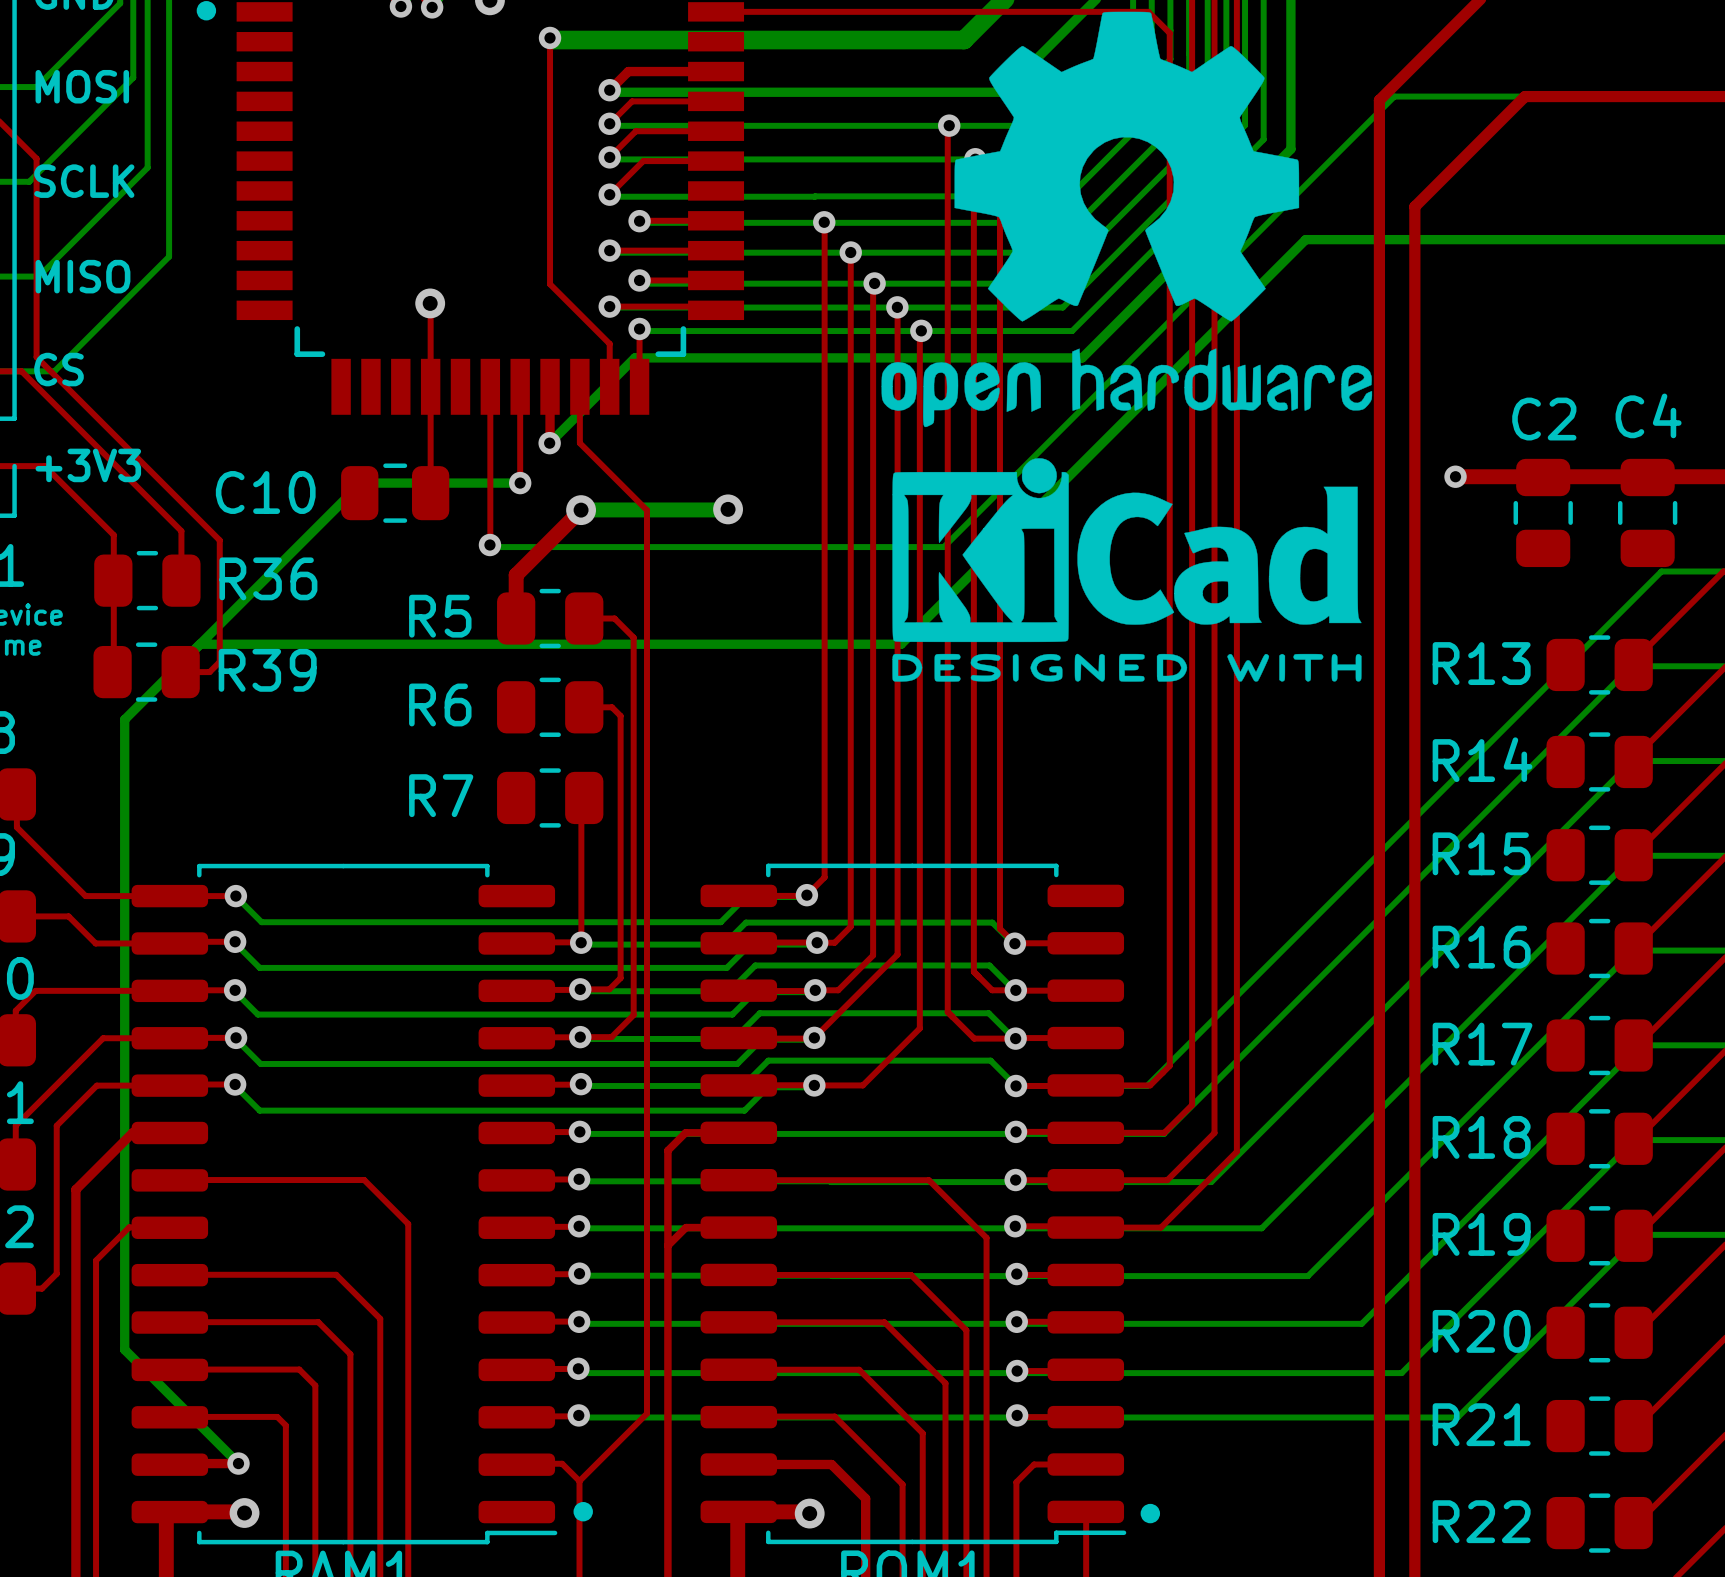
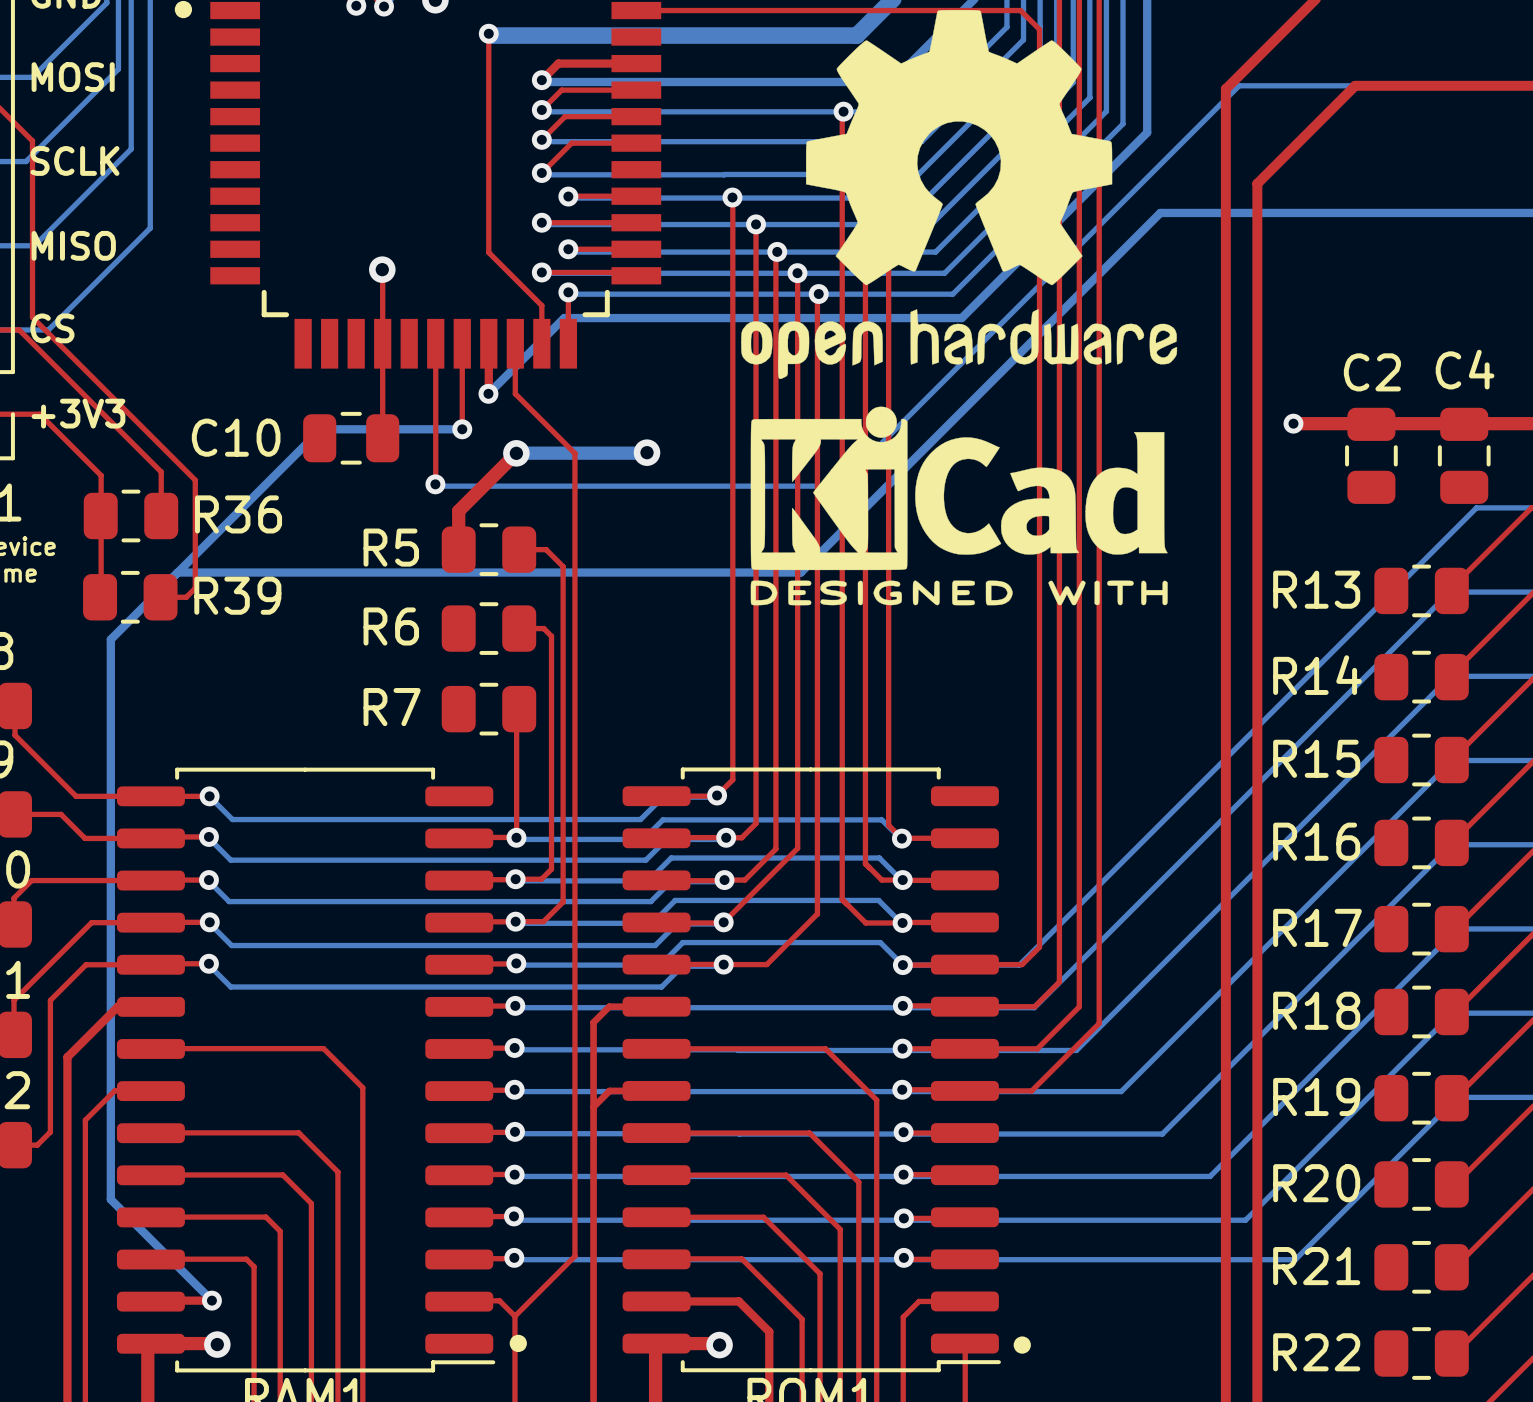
drawing position: (1126, 219) -> (959, 194)
drawing position: (1126, 569) -> (959, 505)

